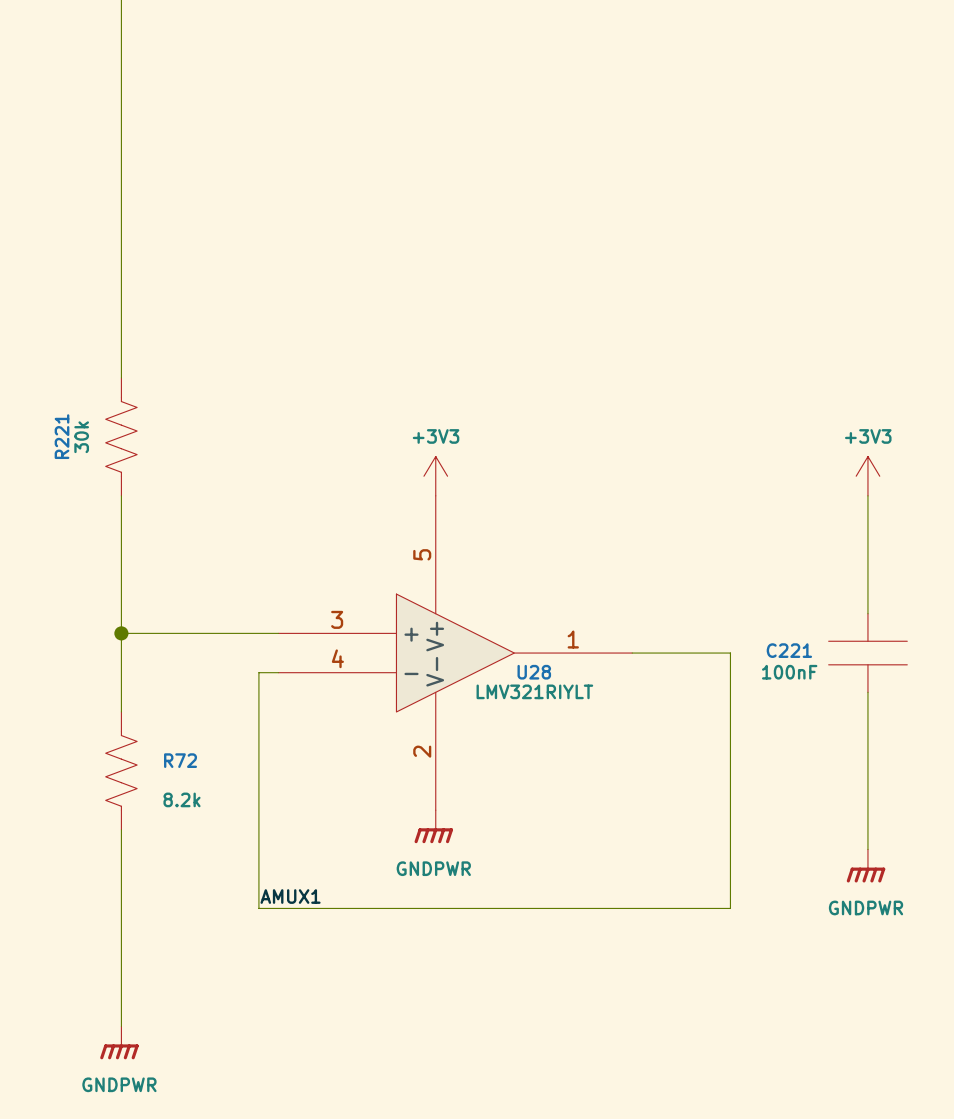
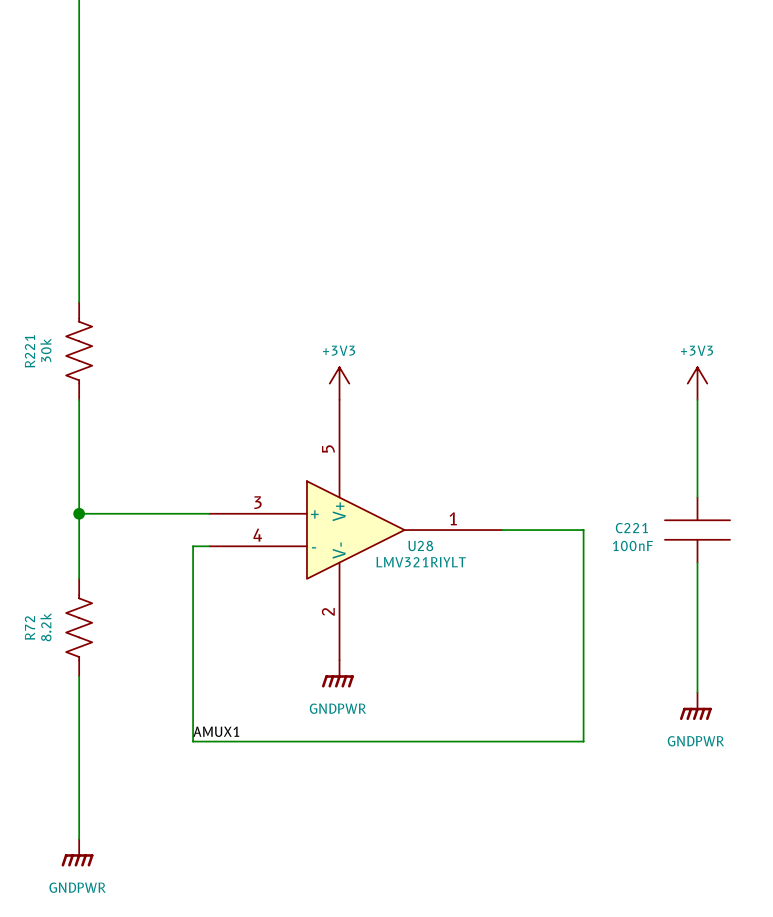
R72 name rotation: 0° (180, 760) -> 90° counterclockwise (29, 627)
R72 name position: R72 (180, 760) -> R72 (29, 627)
R72 value rotation: 0° (182, 799) -> 90° counterclockwise (45, 627)
R72 value position: 8.2k (182, 799) -> 8.2k (45, 627)

